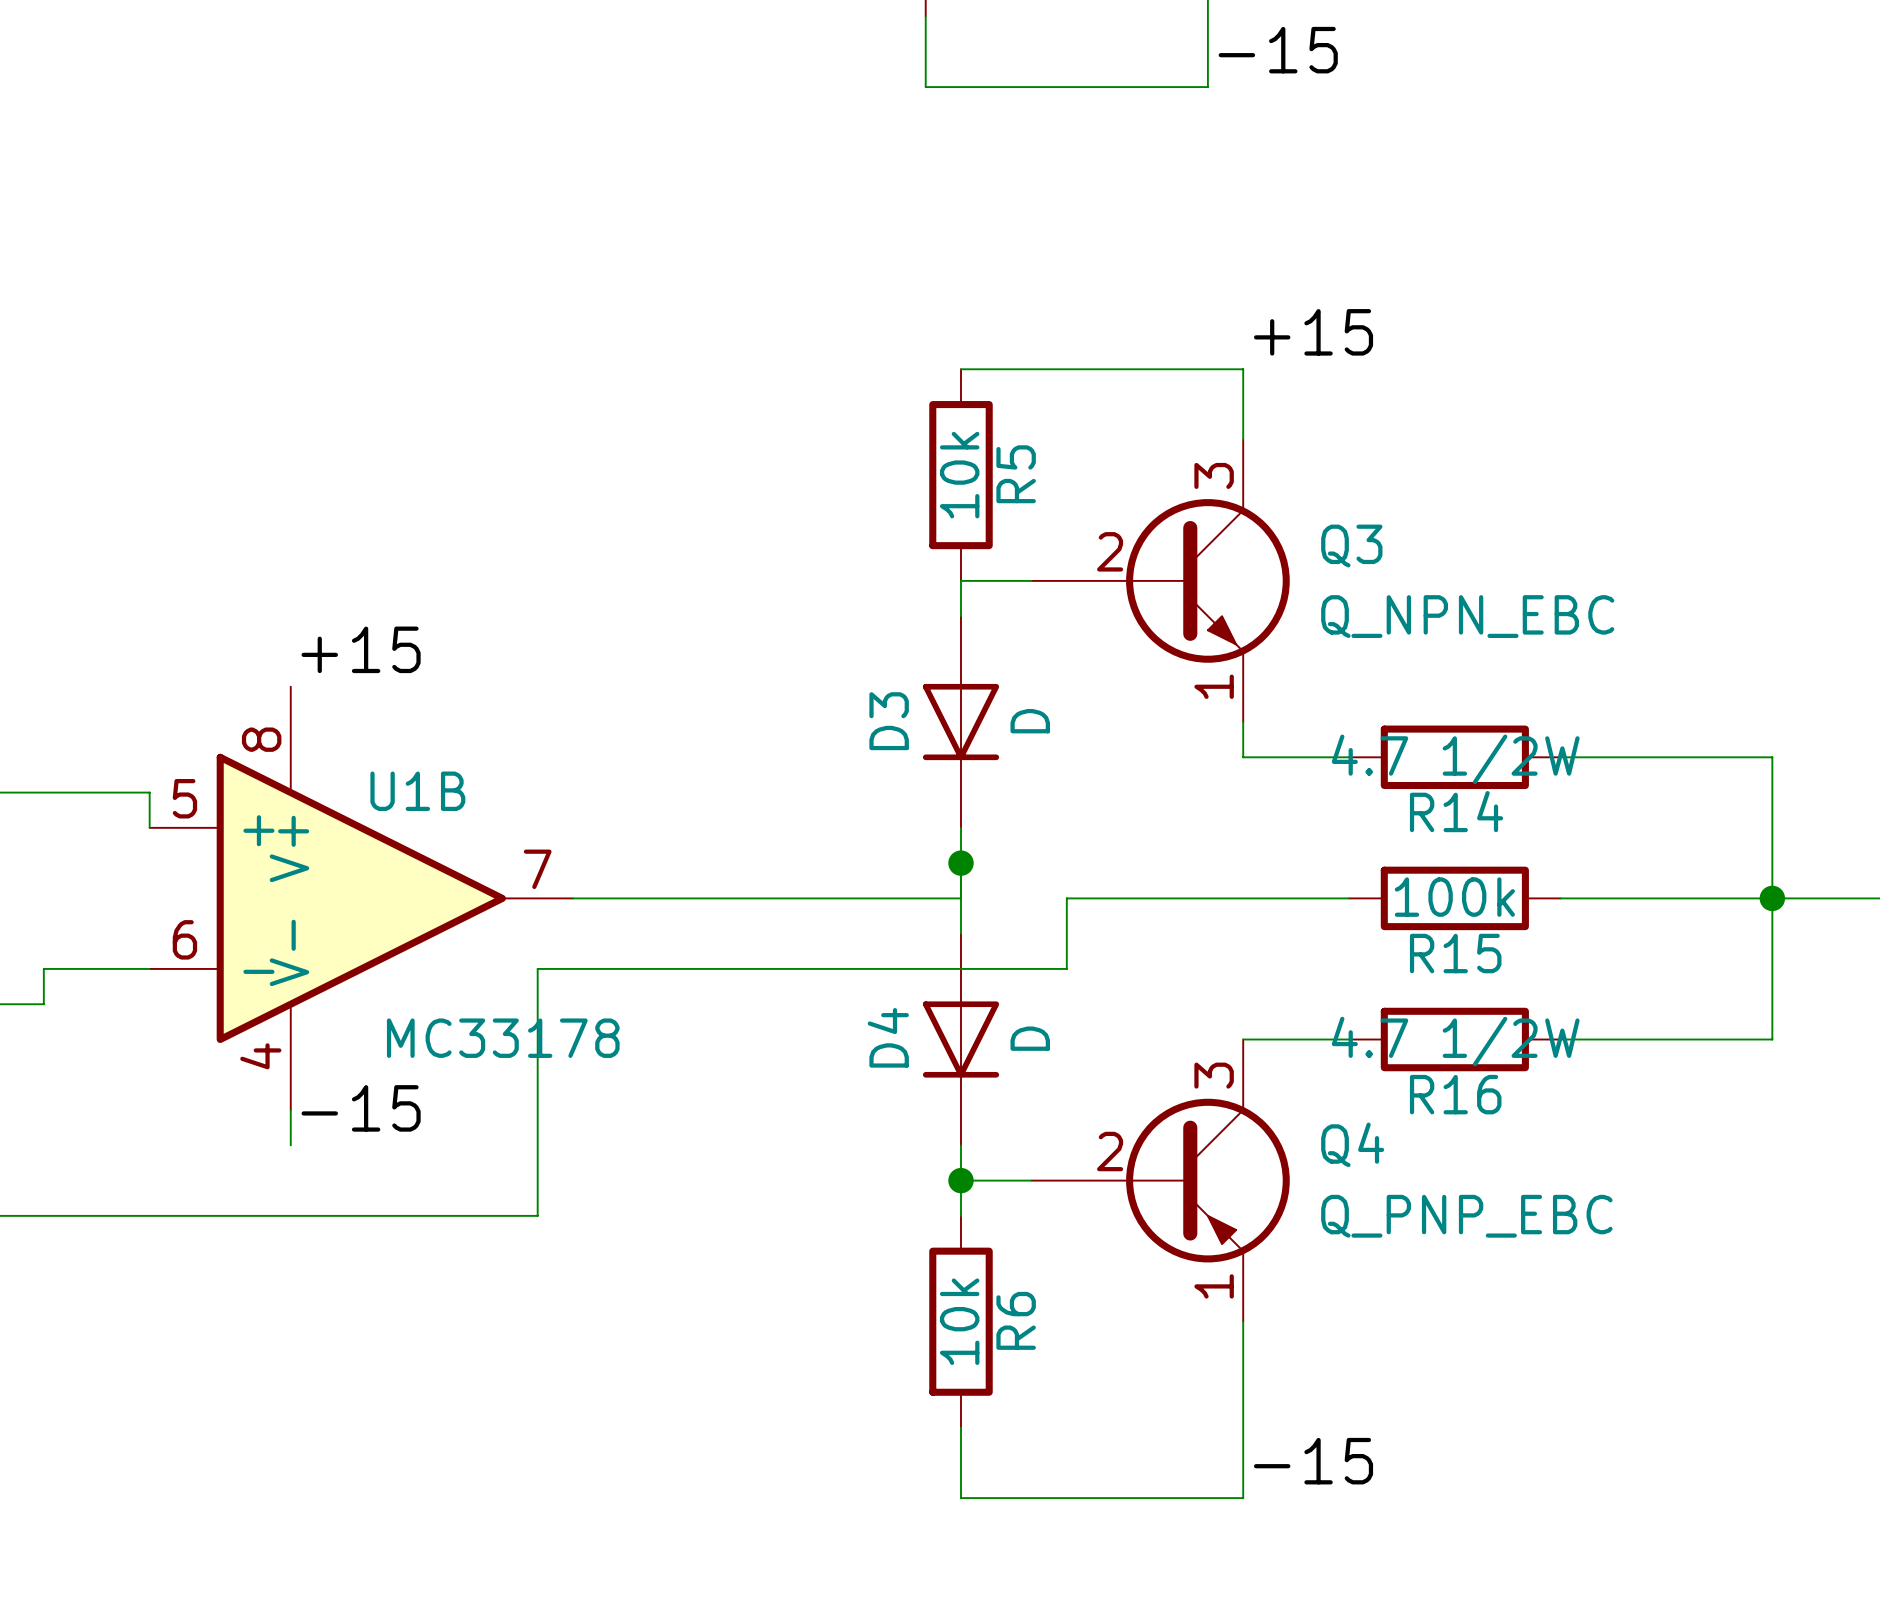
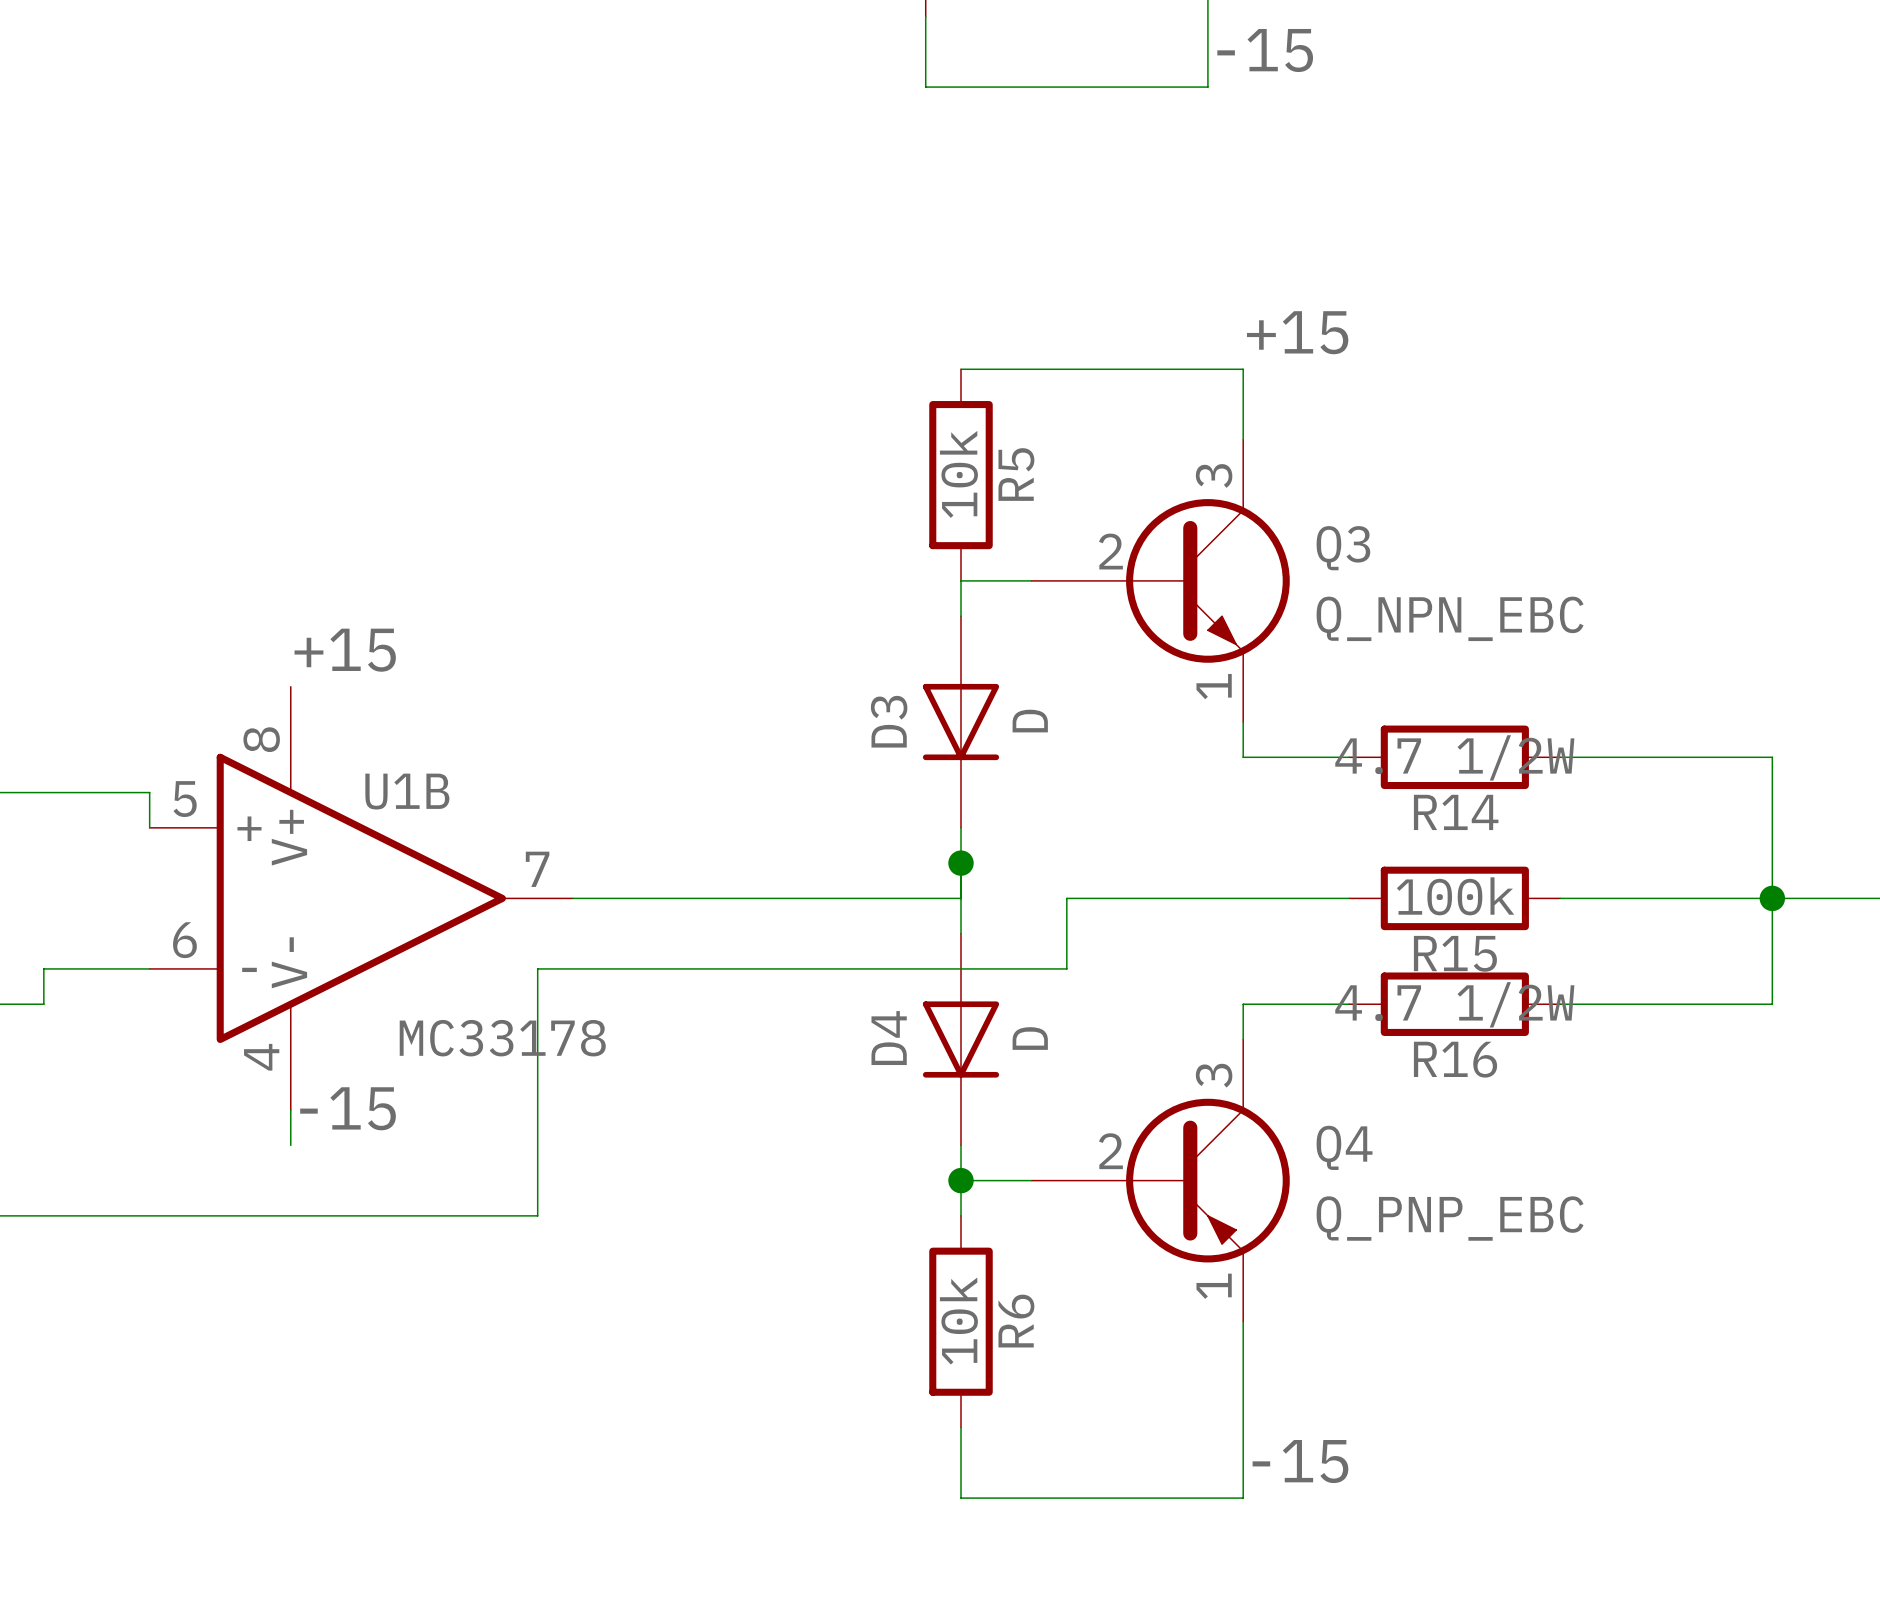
wire: (1772, 1004) (1772, 1039) (1560, 1039) -> (1772, 1004) (1560, 1004)
wire: (1243, 1039) (1349, 1039) -> (1243, 1039) (1243, 1004) (1349, 1004)
R16 position: (1454, 1039) -> (1454, 1004)

